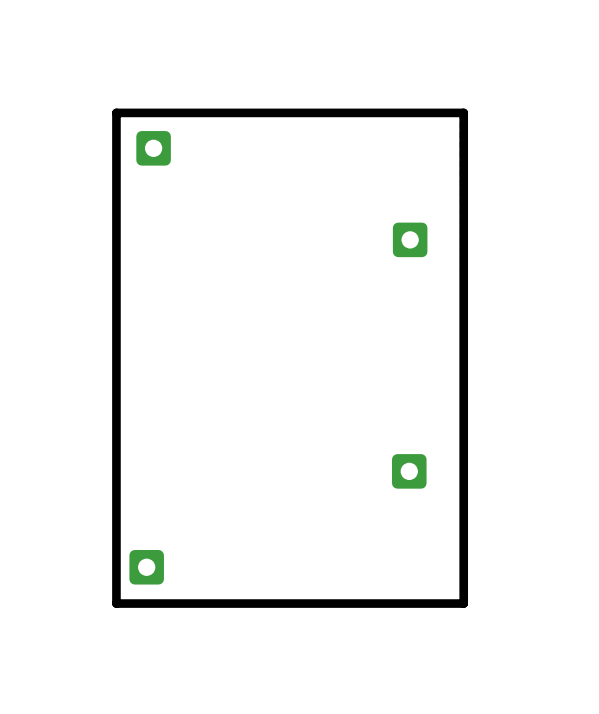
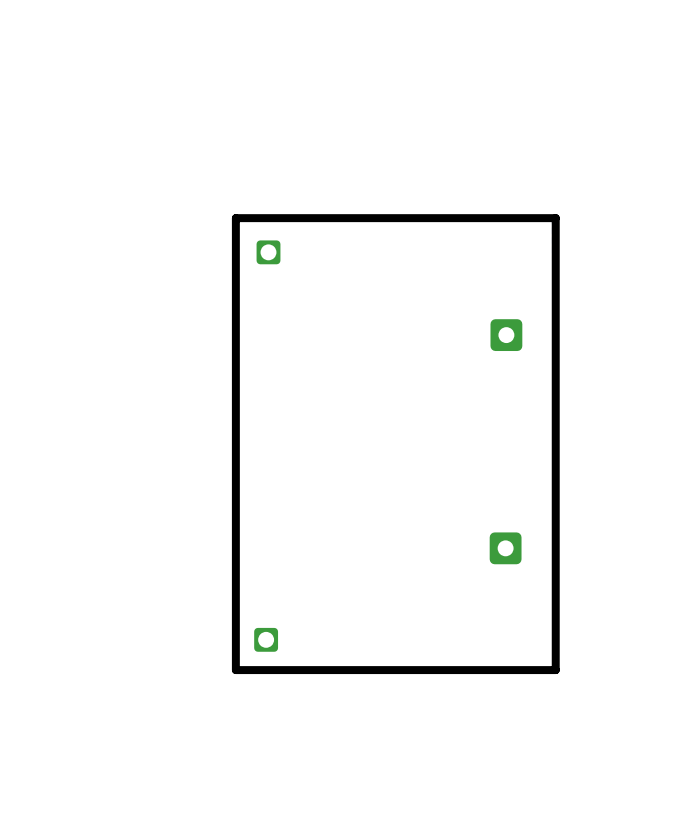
part footprint: [136, 131, 171, 166] -> [256, 240, 281, 265]
part footprint: [129, 549, 164, 585] -> [254, 627, 279, 652]

